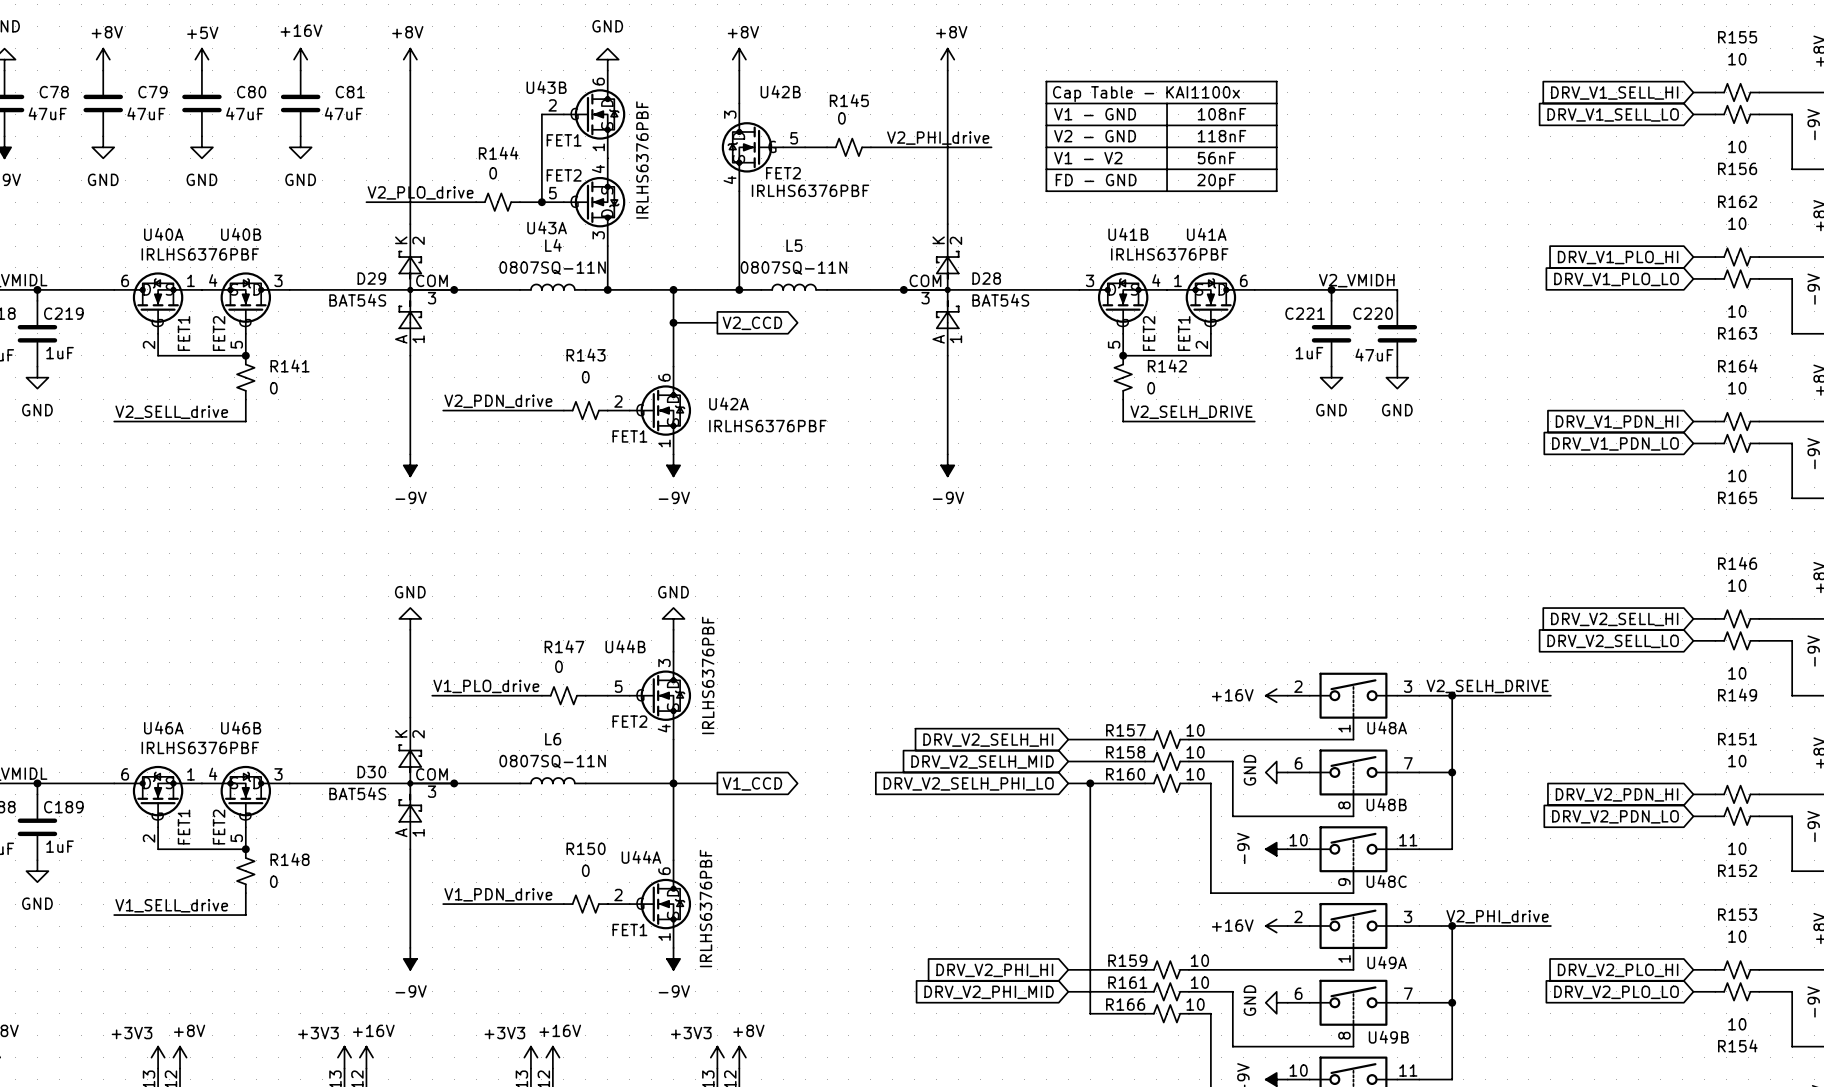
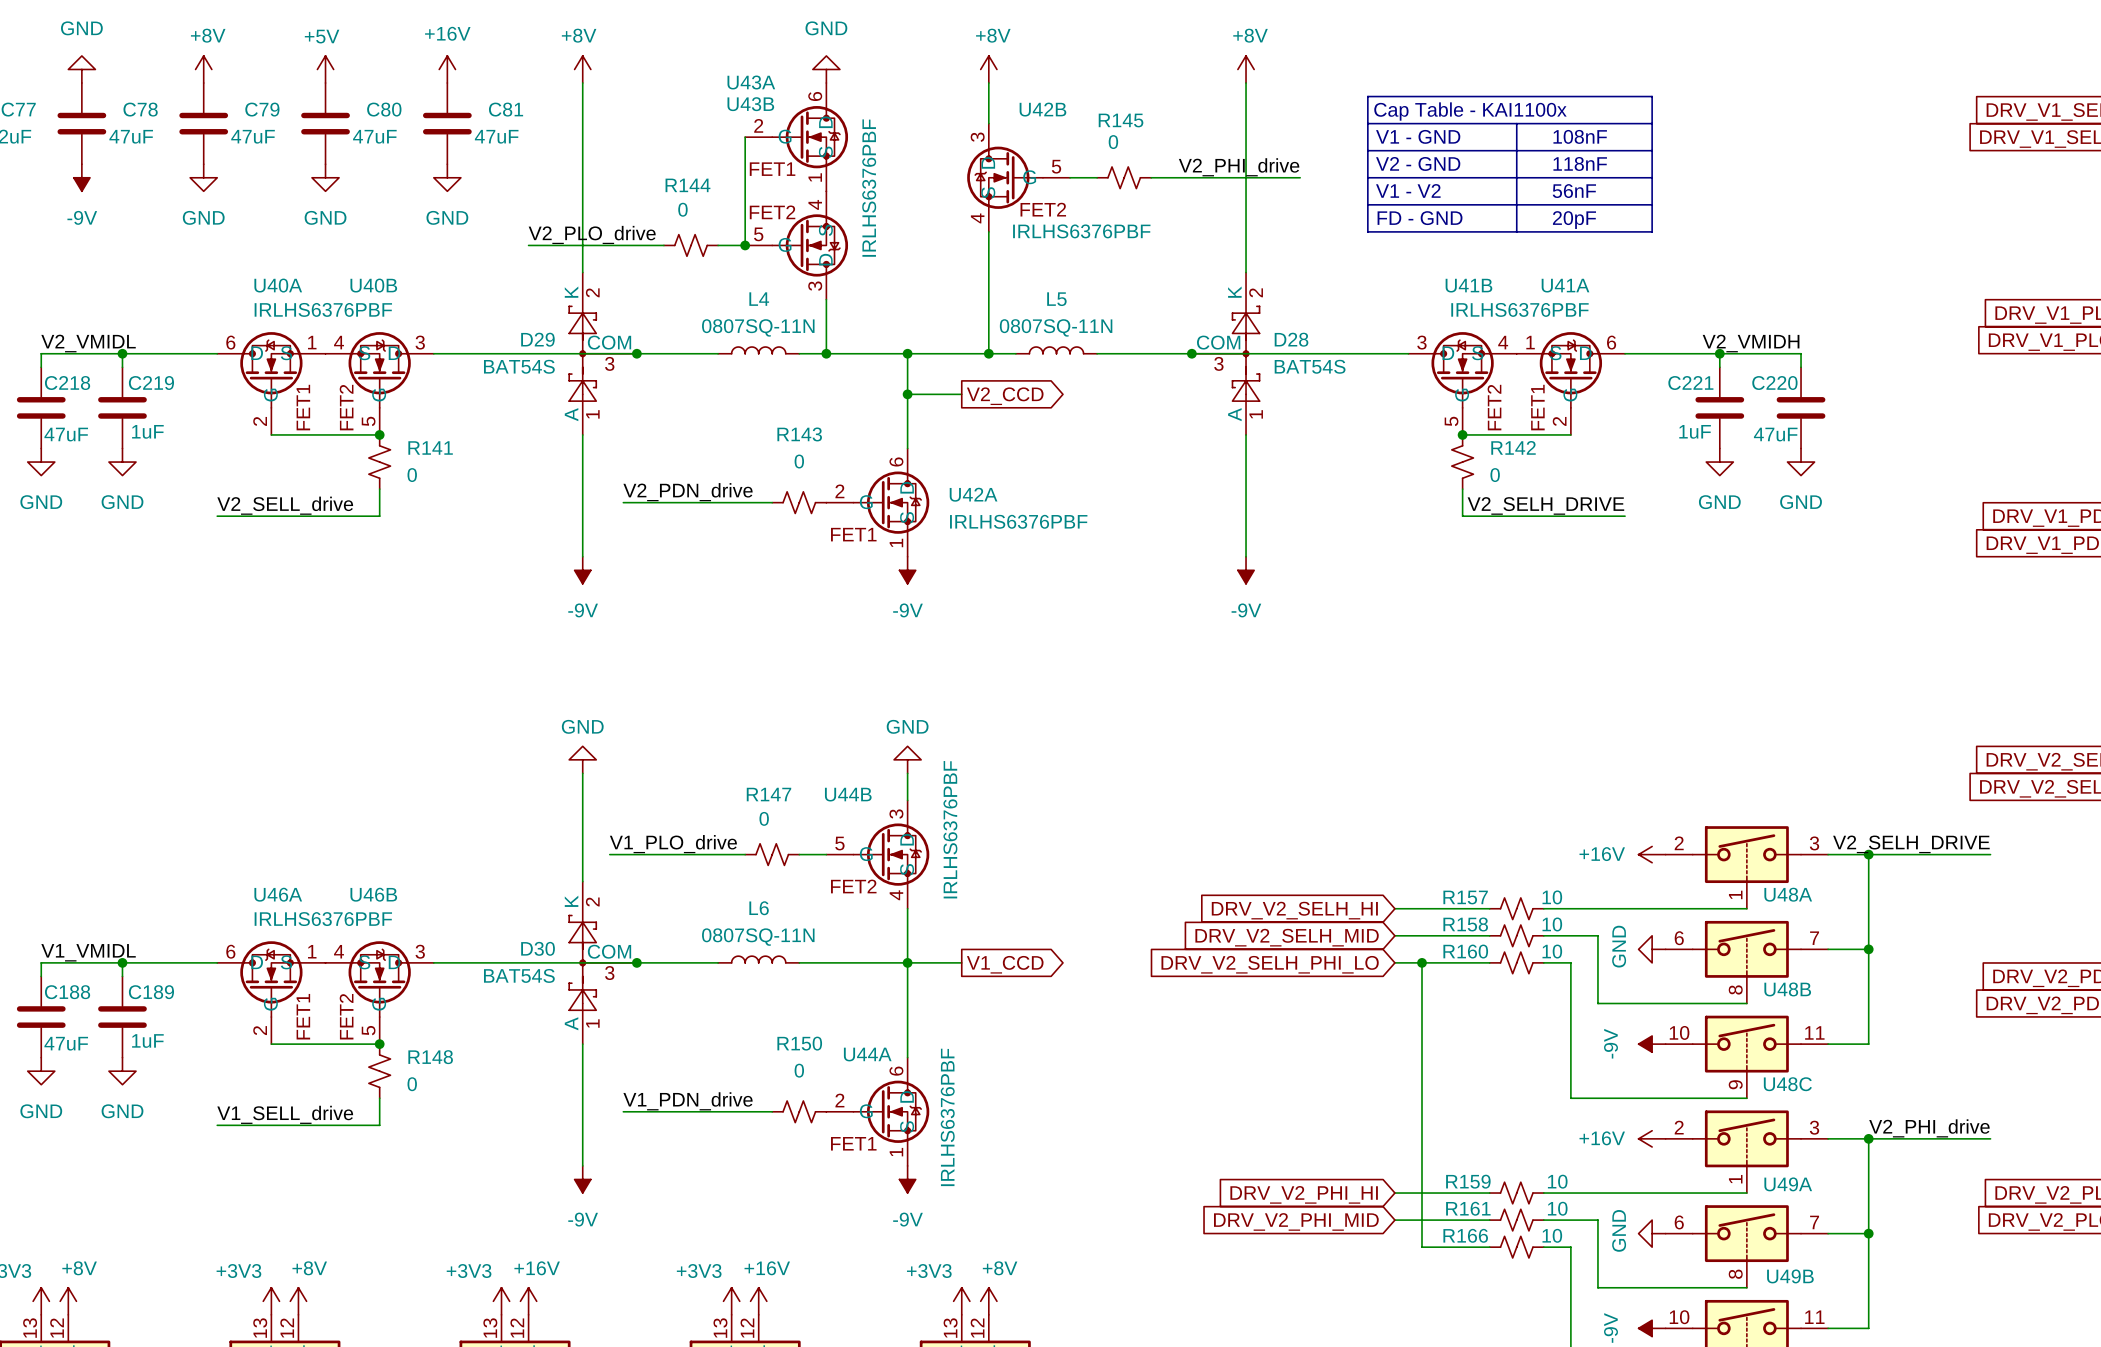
U43B value: none -> IRLHS6376PBF (869, 188)
U43A value: IRLHS6376PBF (642, 159) -> none
U43A name position: U43A (547, 227) -> U43A (751, 82)

